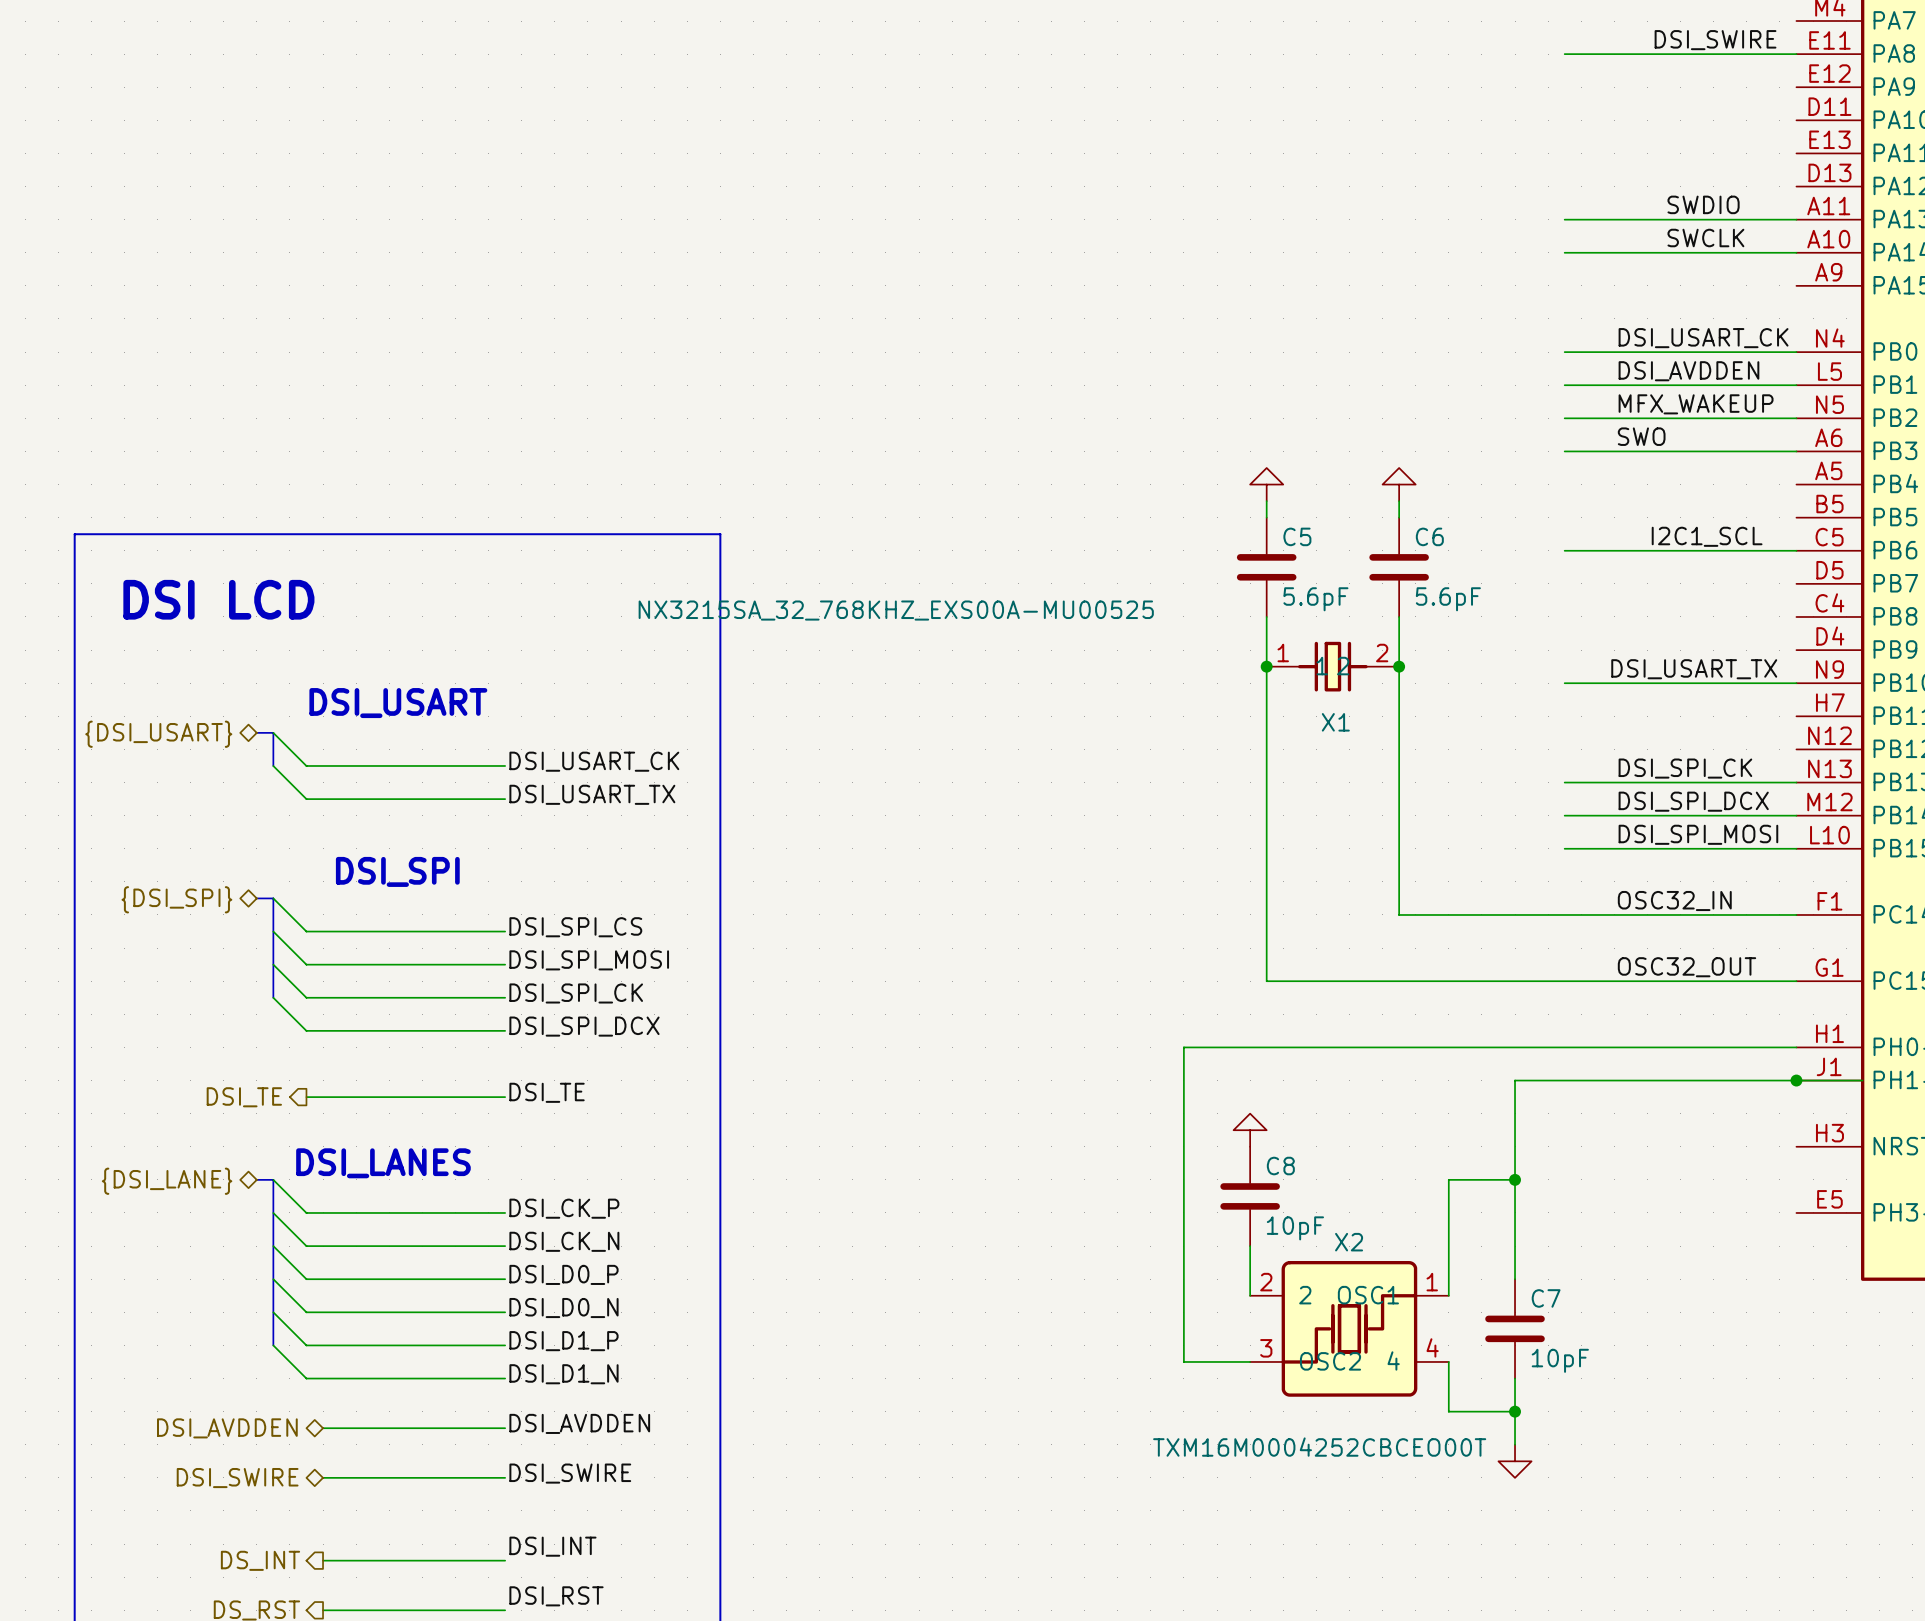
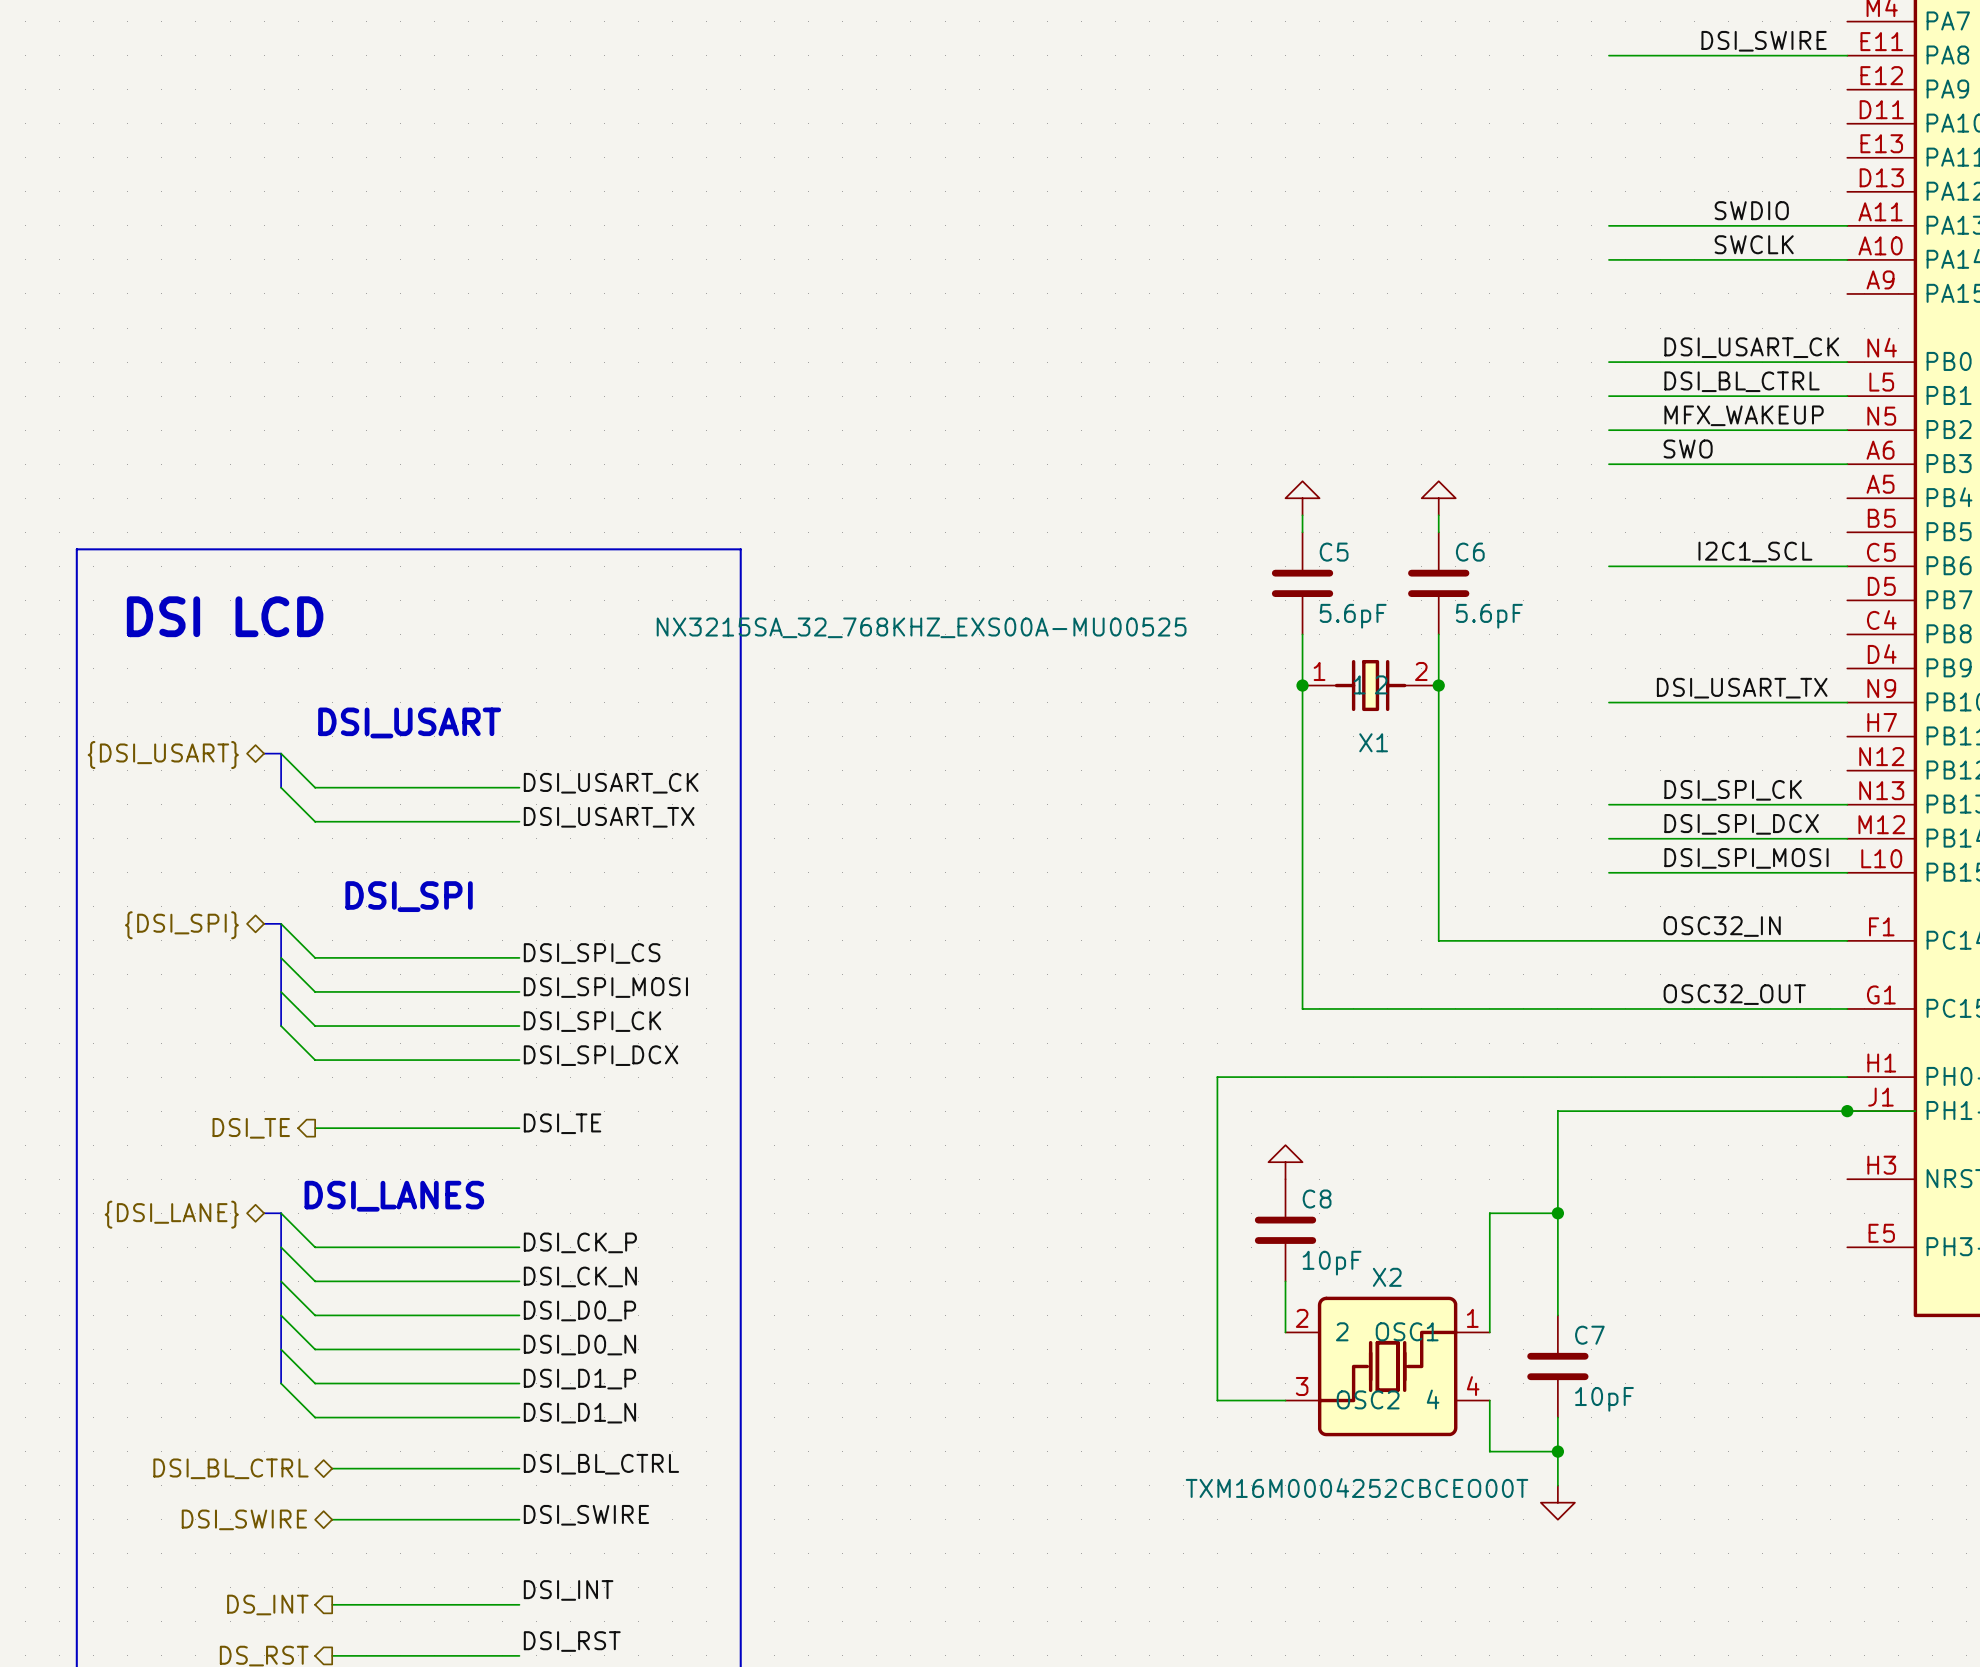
label: DSI_AVDDEN (1688, 371) -> DSI_BL_CTRL (1742, 381)
label: DSI_AVDDEN (579, 1423) -> DSI_BL_CTRL (601, 1464)
hierarchical label: DSI_AVDDEN (227, 1428) -> DSI_BL_CTRL (230, 1468)

